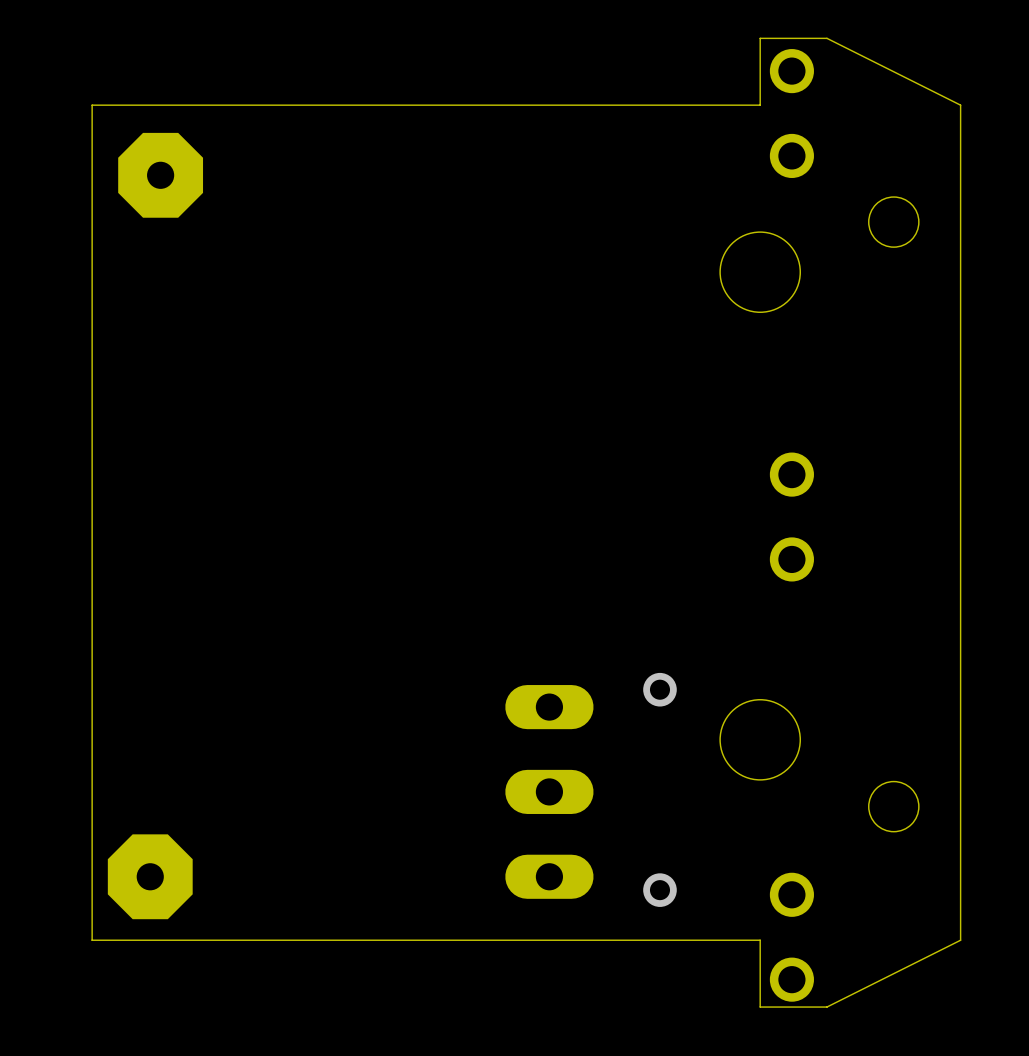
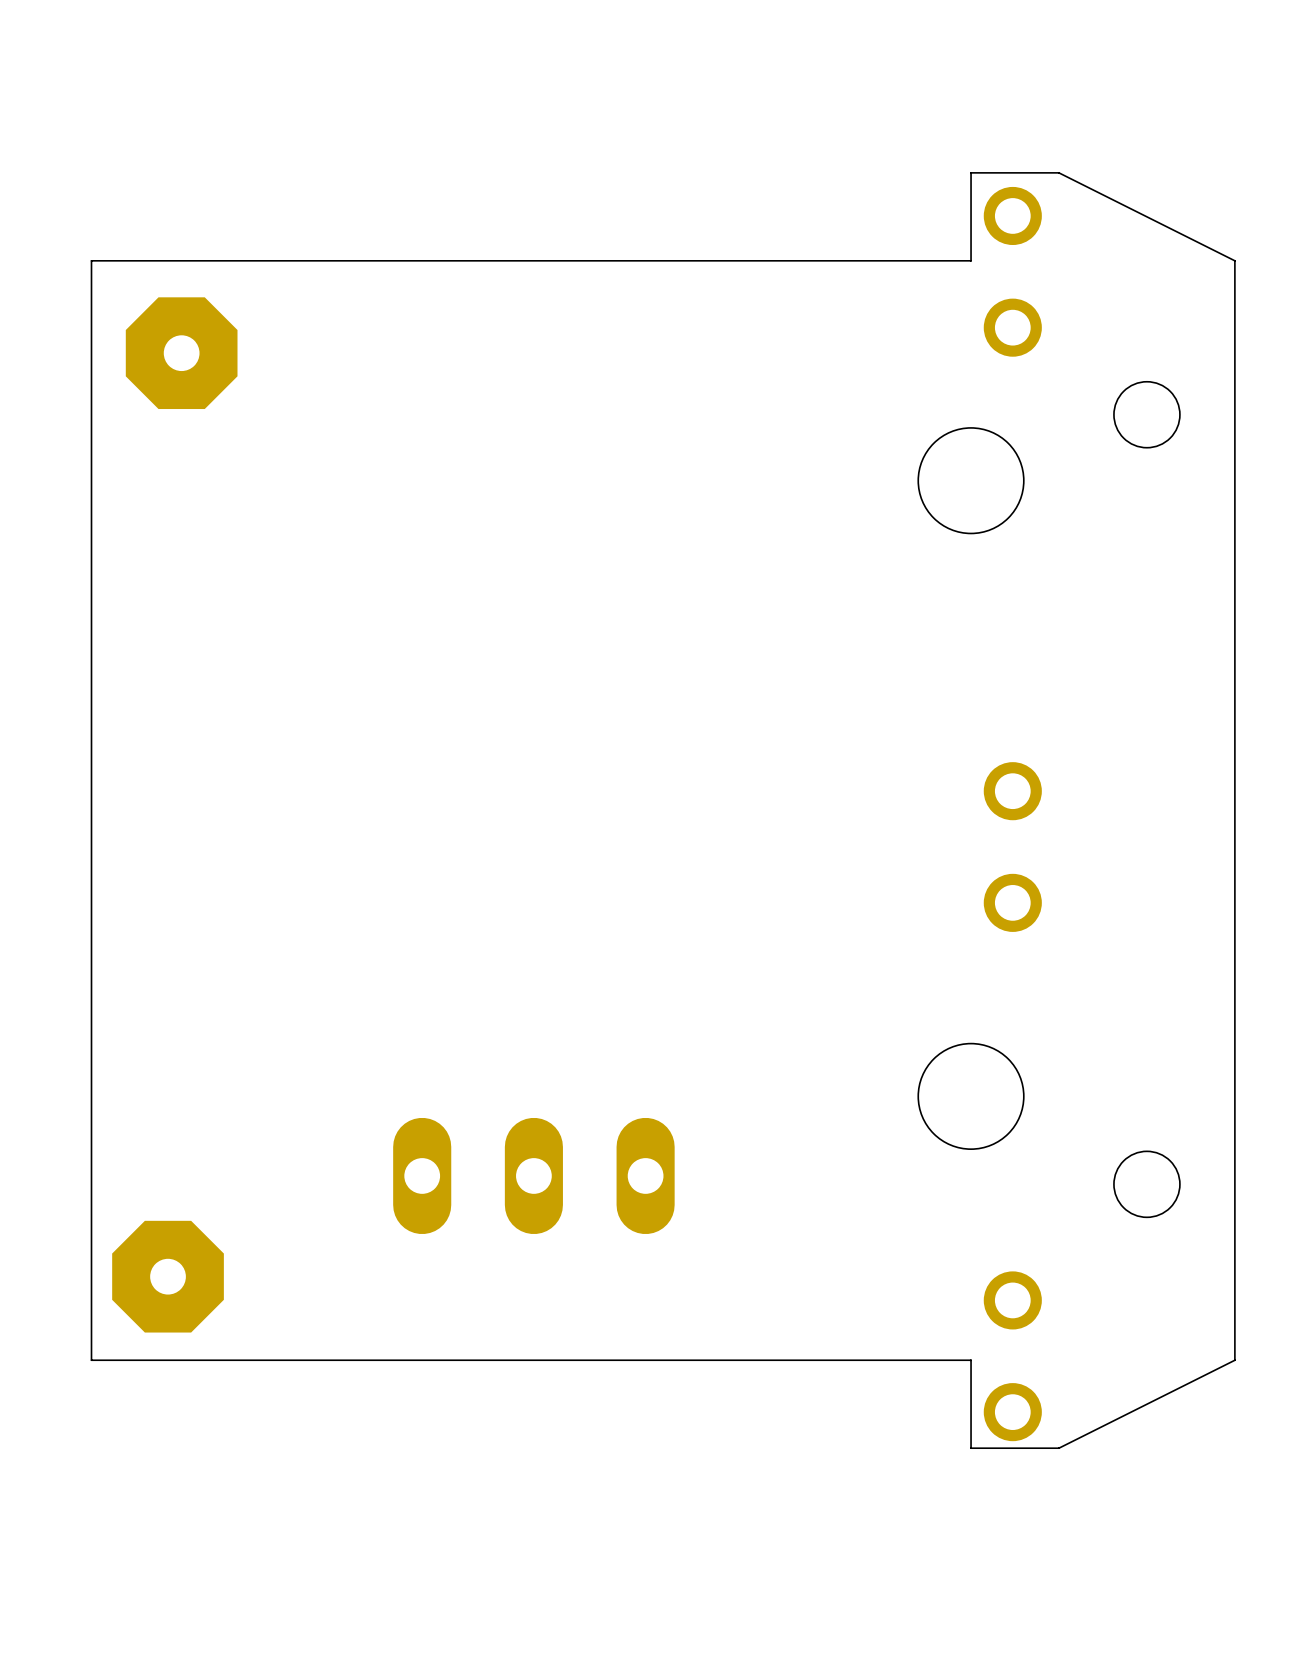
part position: (791, 517) -> (1012, 847)
via: (659, 689) -> none
part rotation: 0° (549, 791) -> 90° clockwise (533, 1175)
via: (659, 890) -> none

